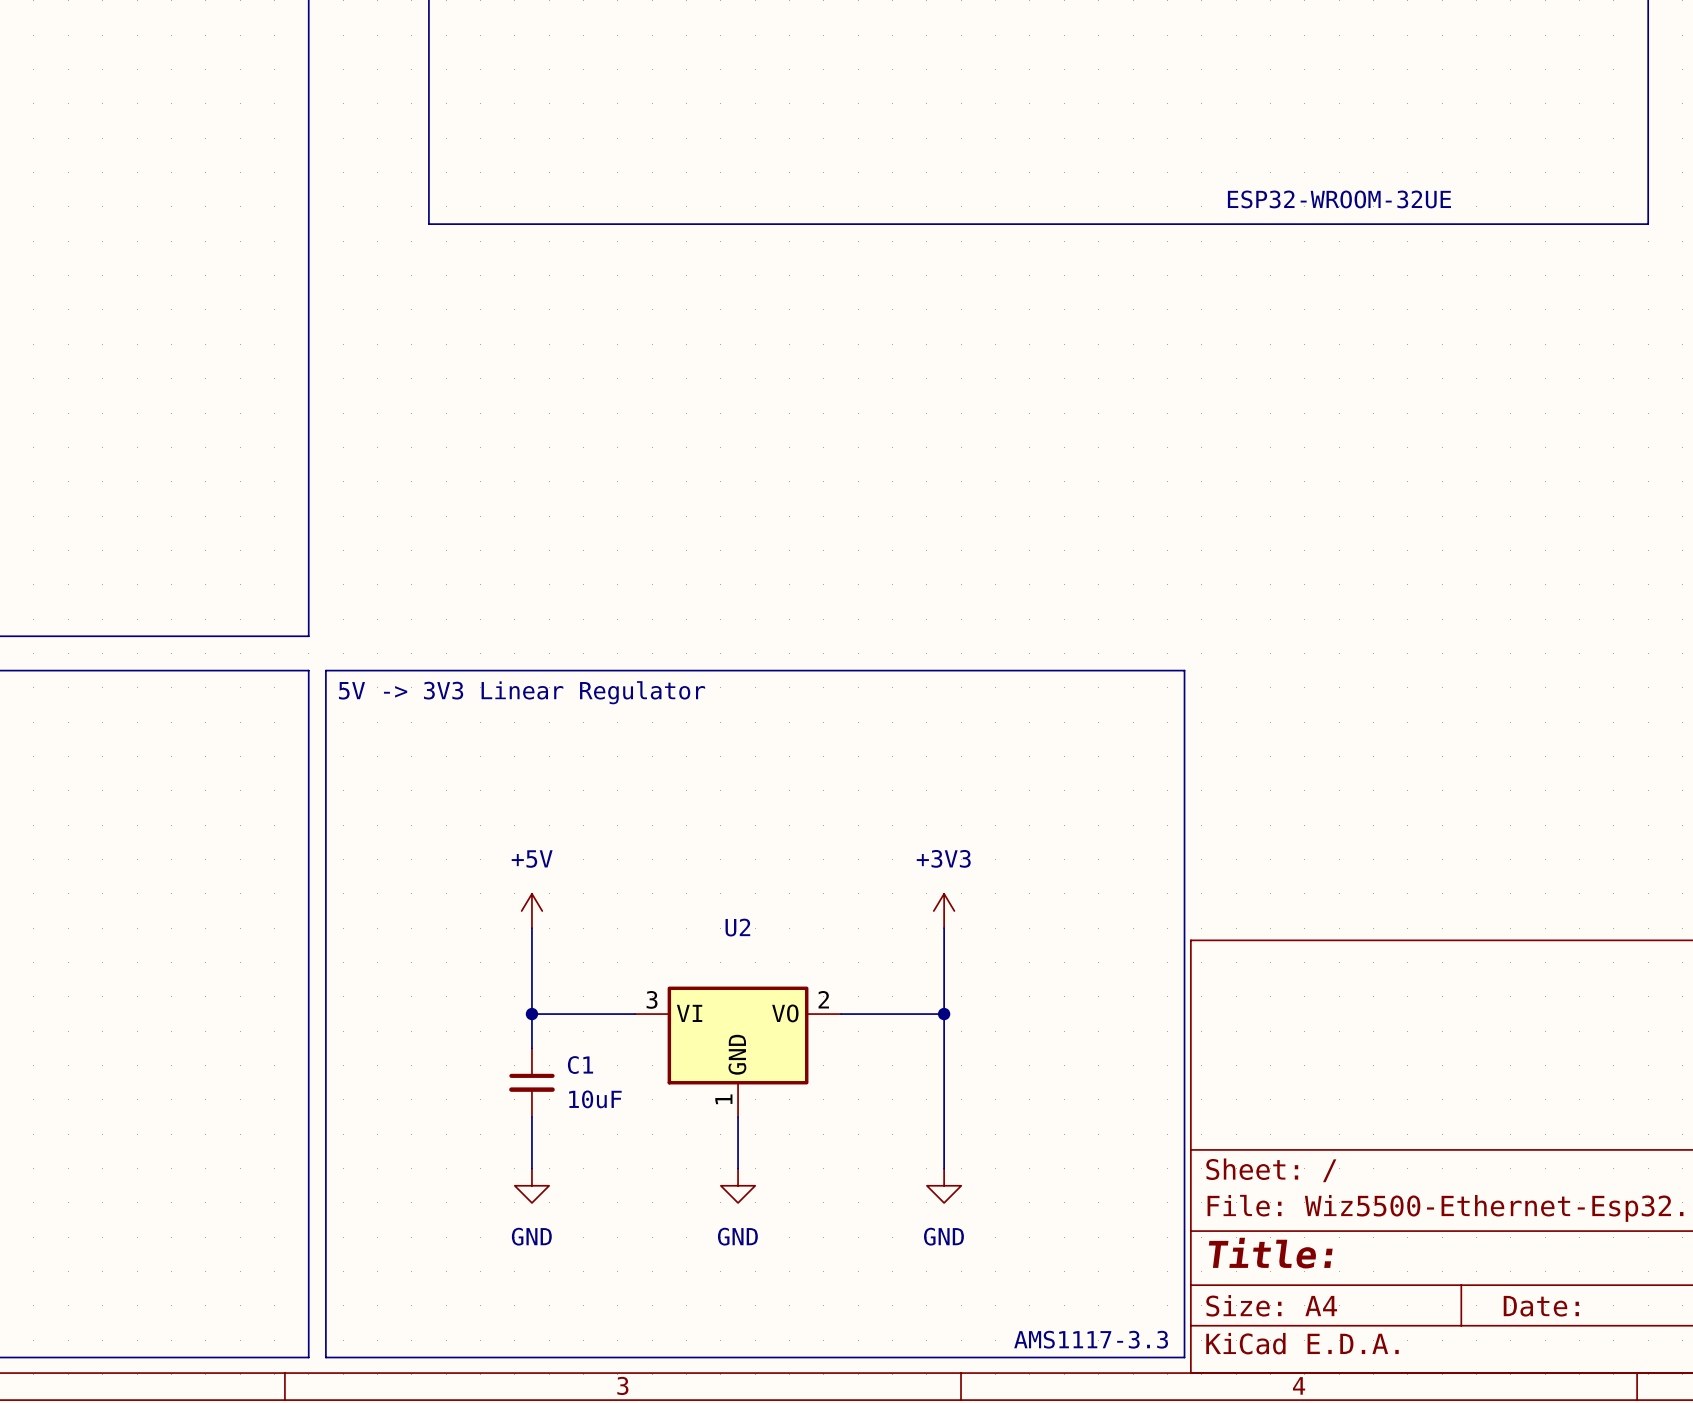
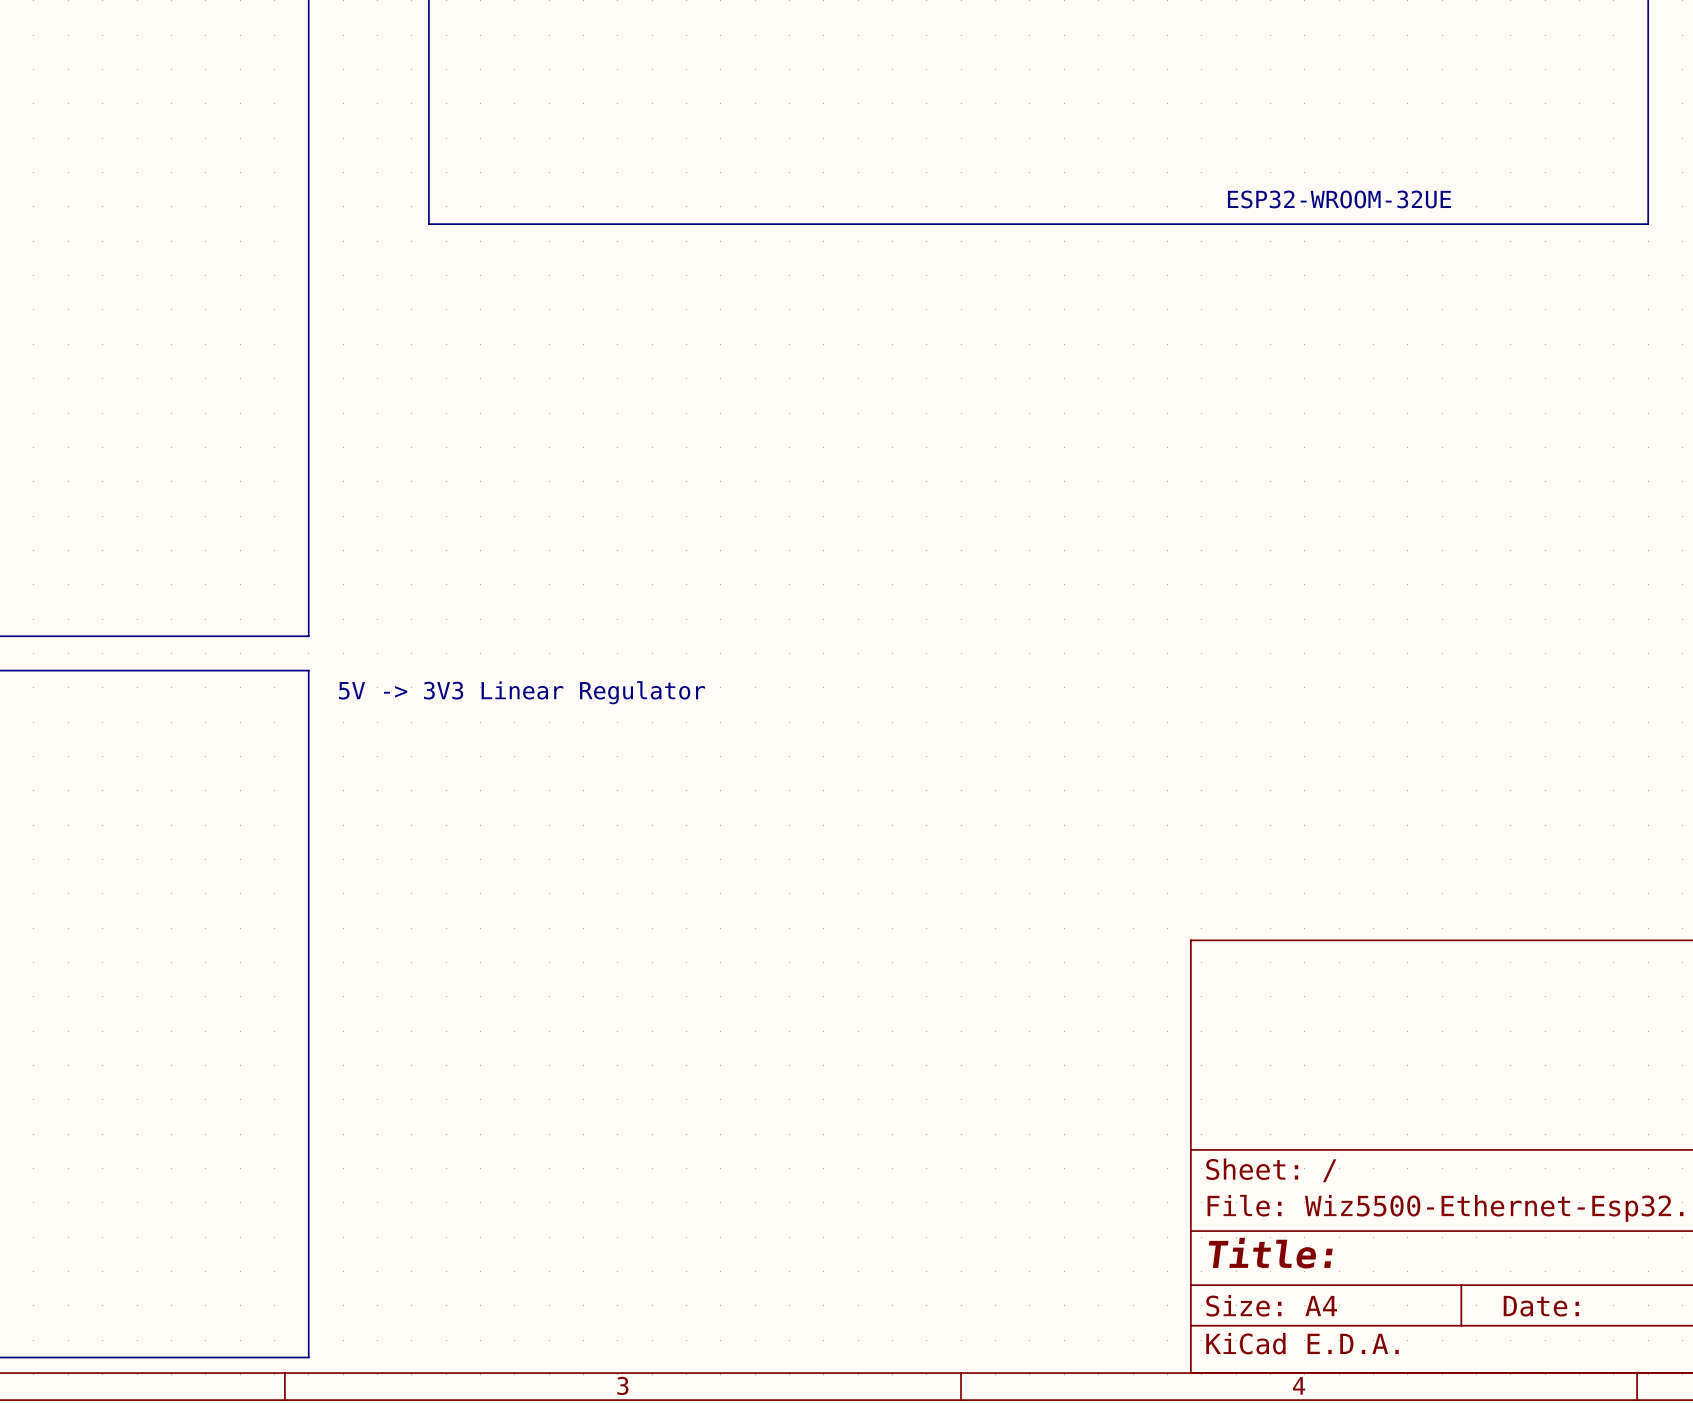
line: (325, 670) (1184, 670) (1184, 1357) (325, 1357) (325, 670) -> none
power symbol: +5V (531, 911) -> none
power symbol: +3V3 (944, 911) -> none
wire: (531, 928) (531, 1048) -> none
wire: (944, 928) (944, 1168) -> none
wire: (531, 1014) (635, 1014) -> none
junction: (531, 1014) -> none
wire: (841, 1014) (944, 1014) -> none
junction: (944, 1014) -> none
U2: AMS1117-3.3 (738, 1051) -> none
C1: 10uF (531, 1082) -> none
wire: (531, 1117) (531, 1168) -> none
wire: (738, 1117) (738, 1168) -> none
power symbol: GND (531, 1185) -> none
power symbol: GND (738, 1185) -> none
power symbol: GND (944, 1185) -> none

